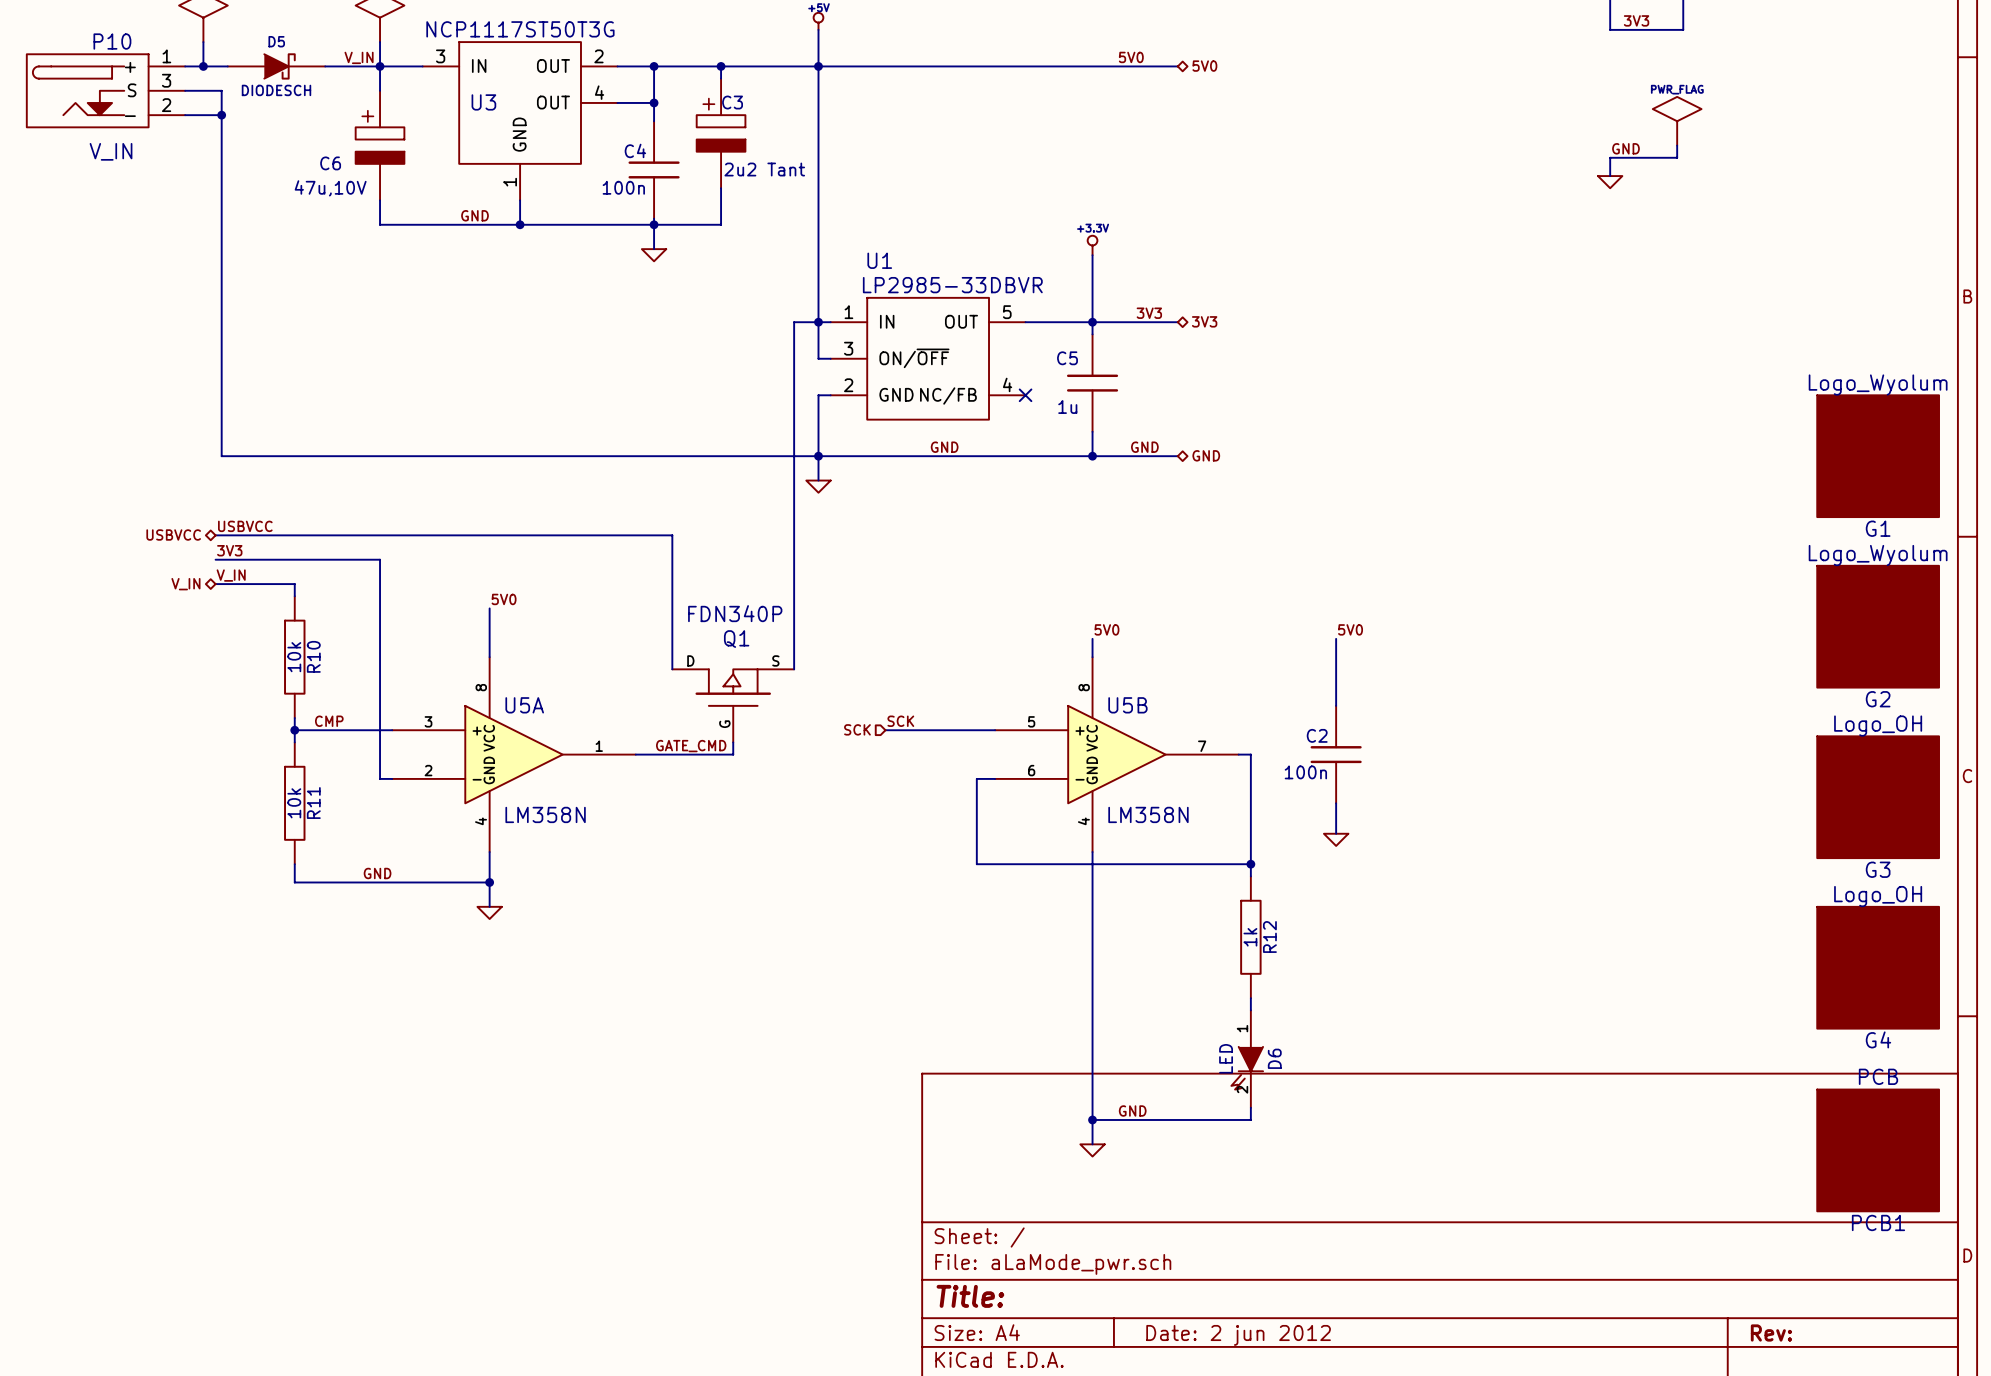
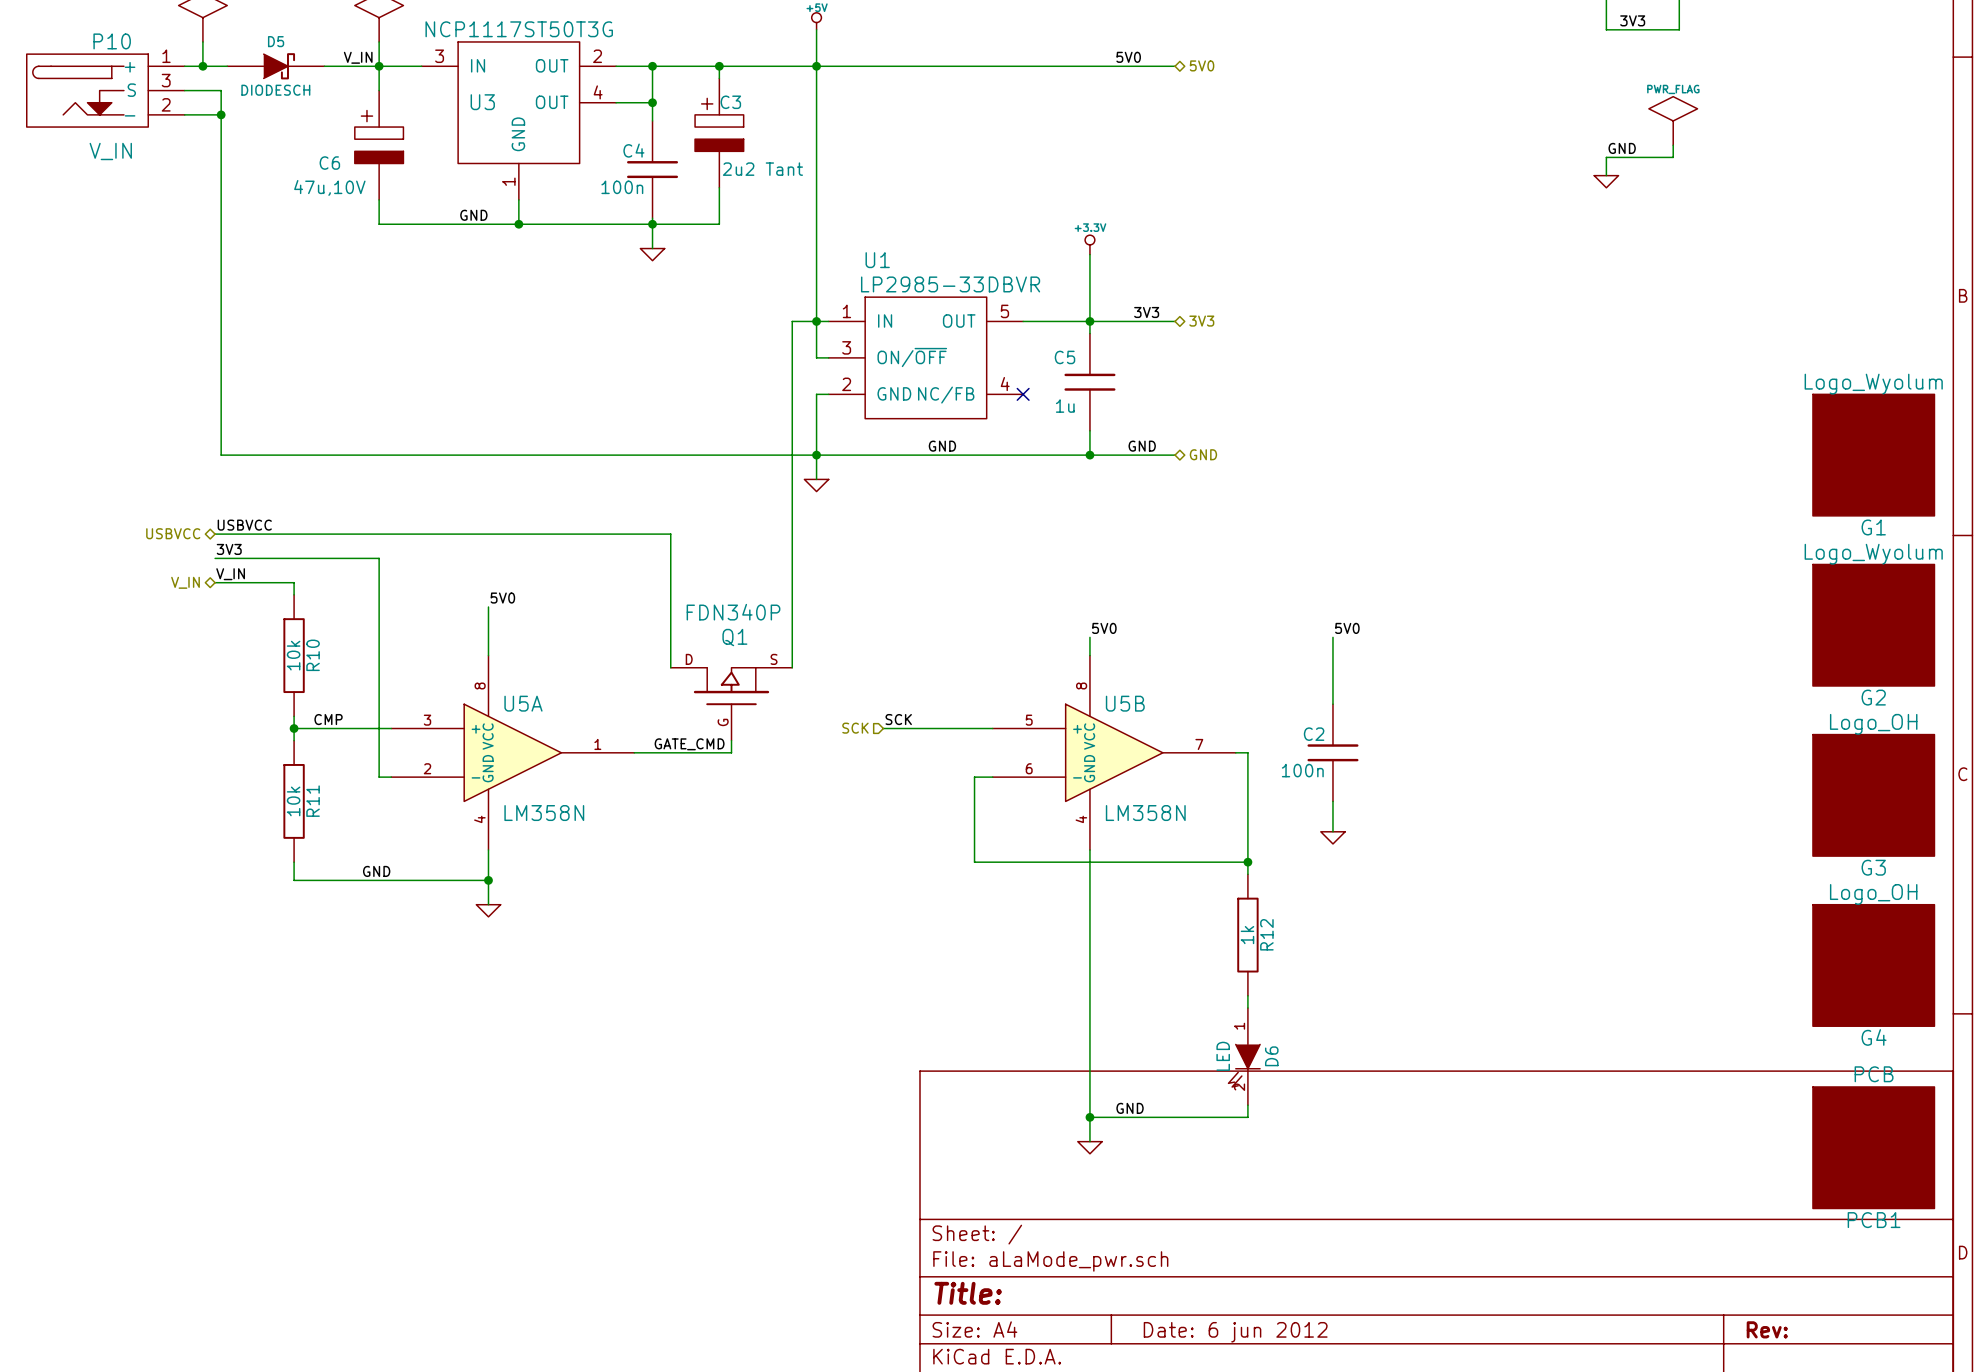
title block: Date: 2 jun 2012 (1238, 1335) -> Date: 6 jun 2012 (1235, 1332)

